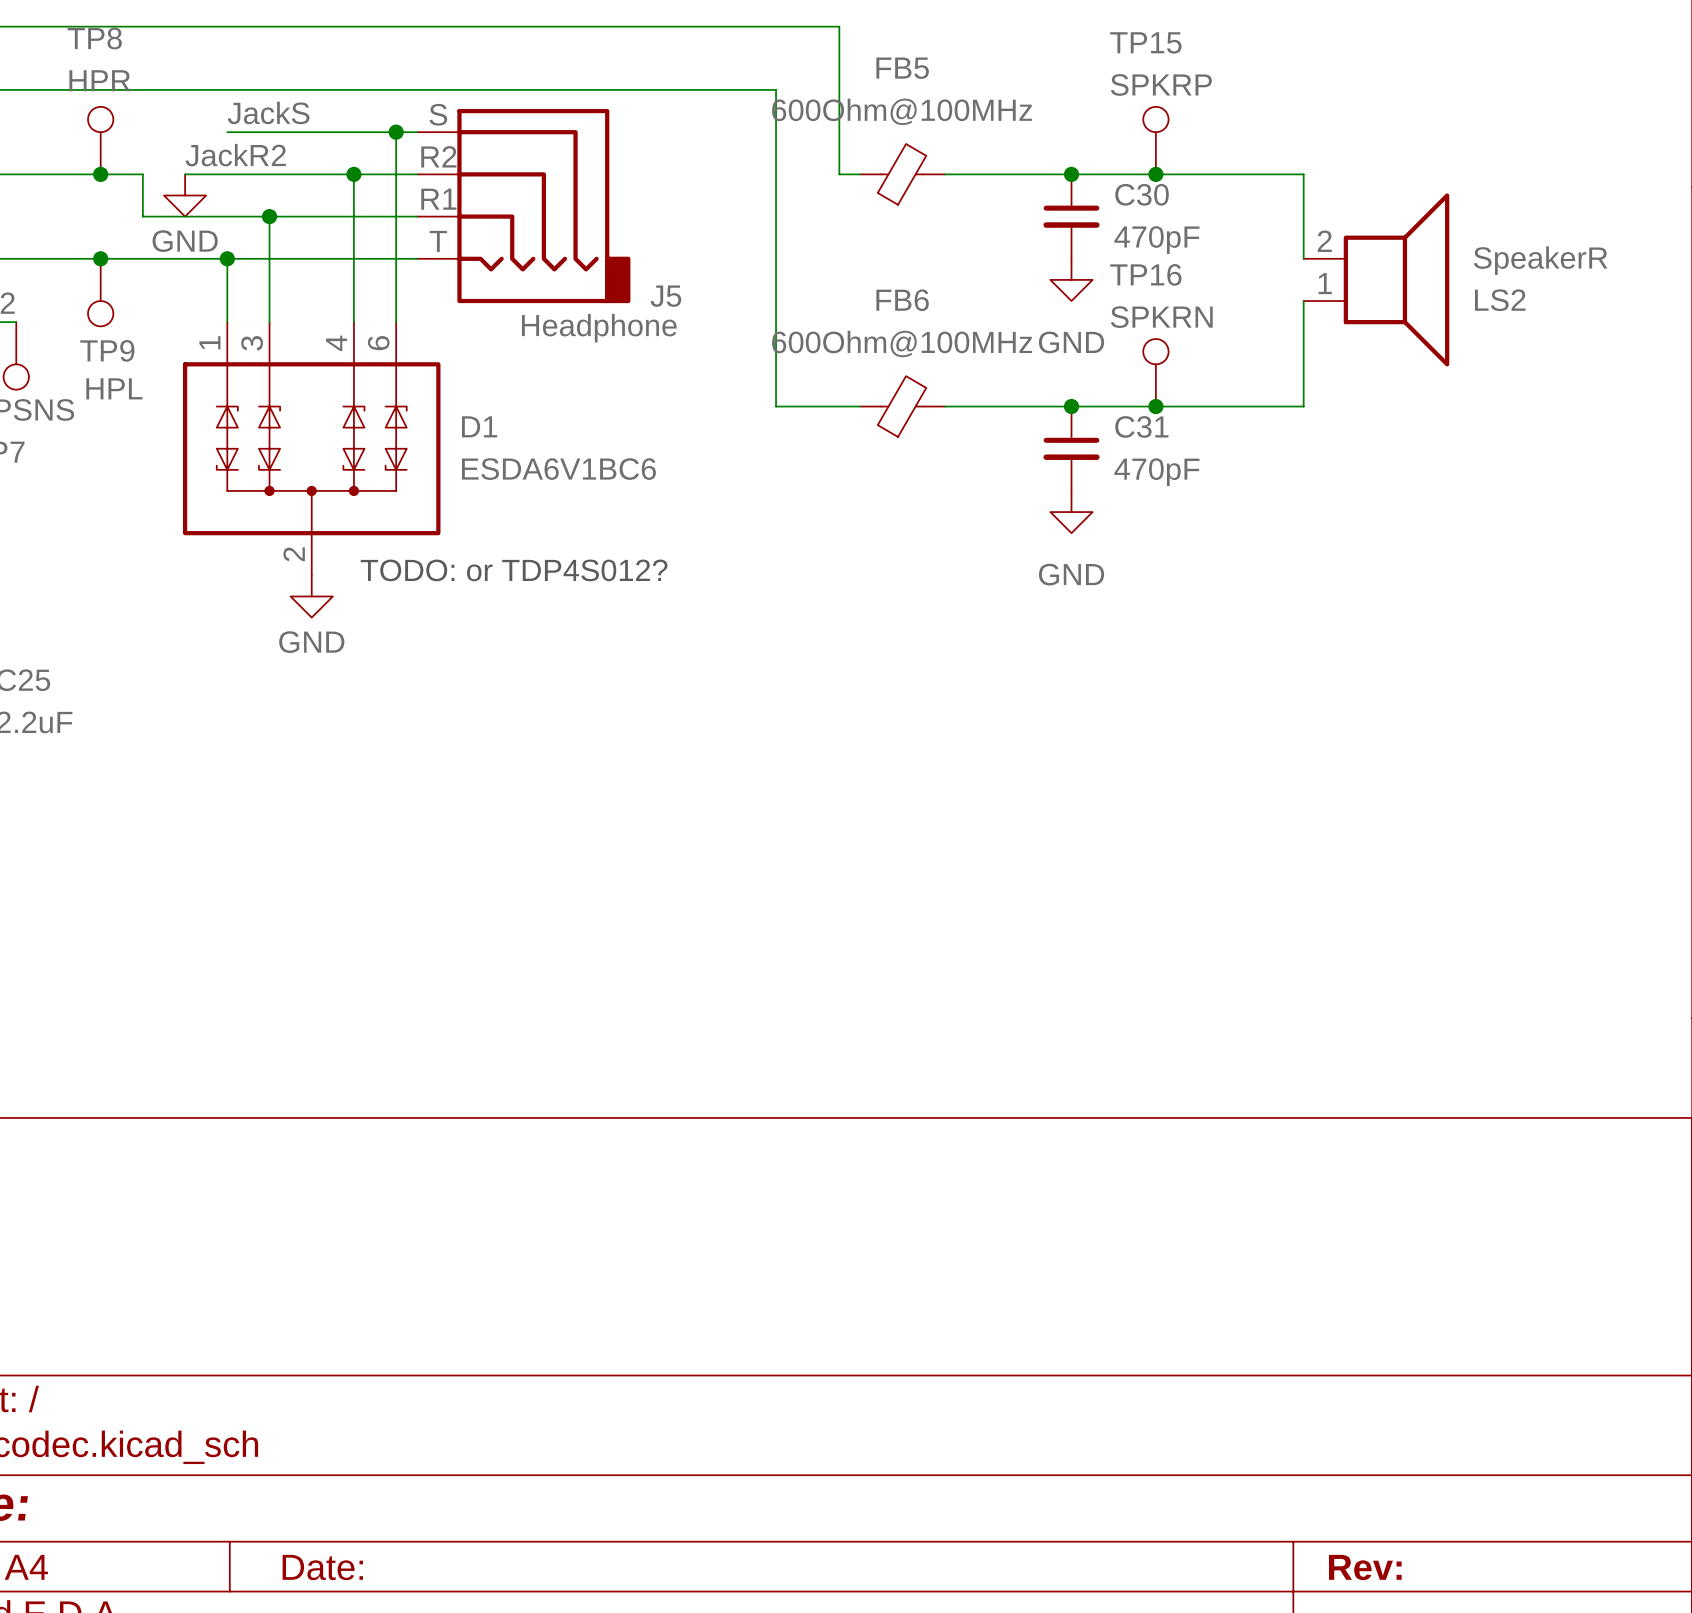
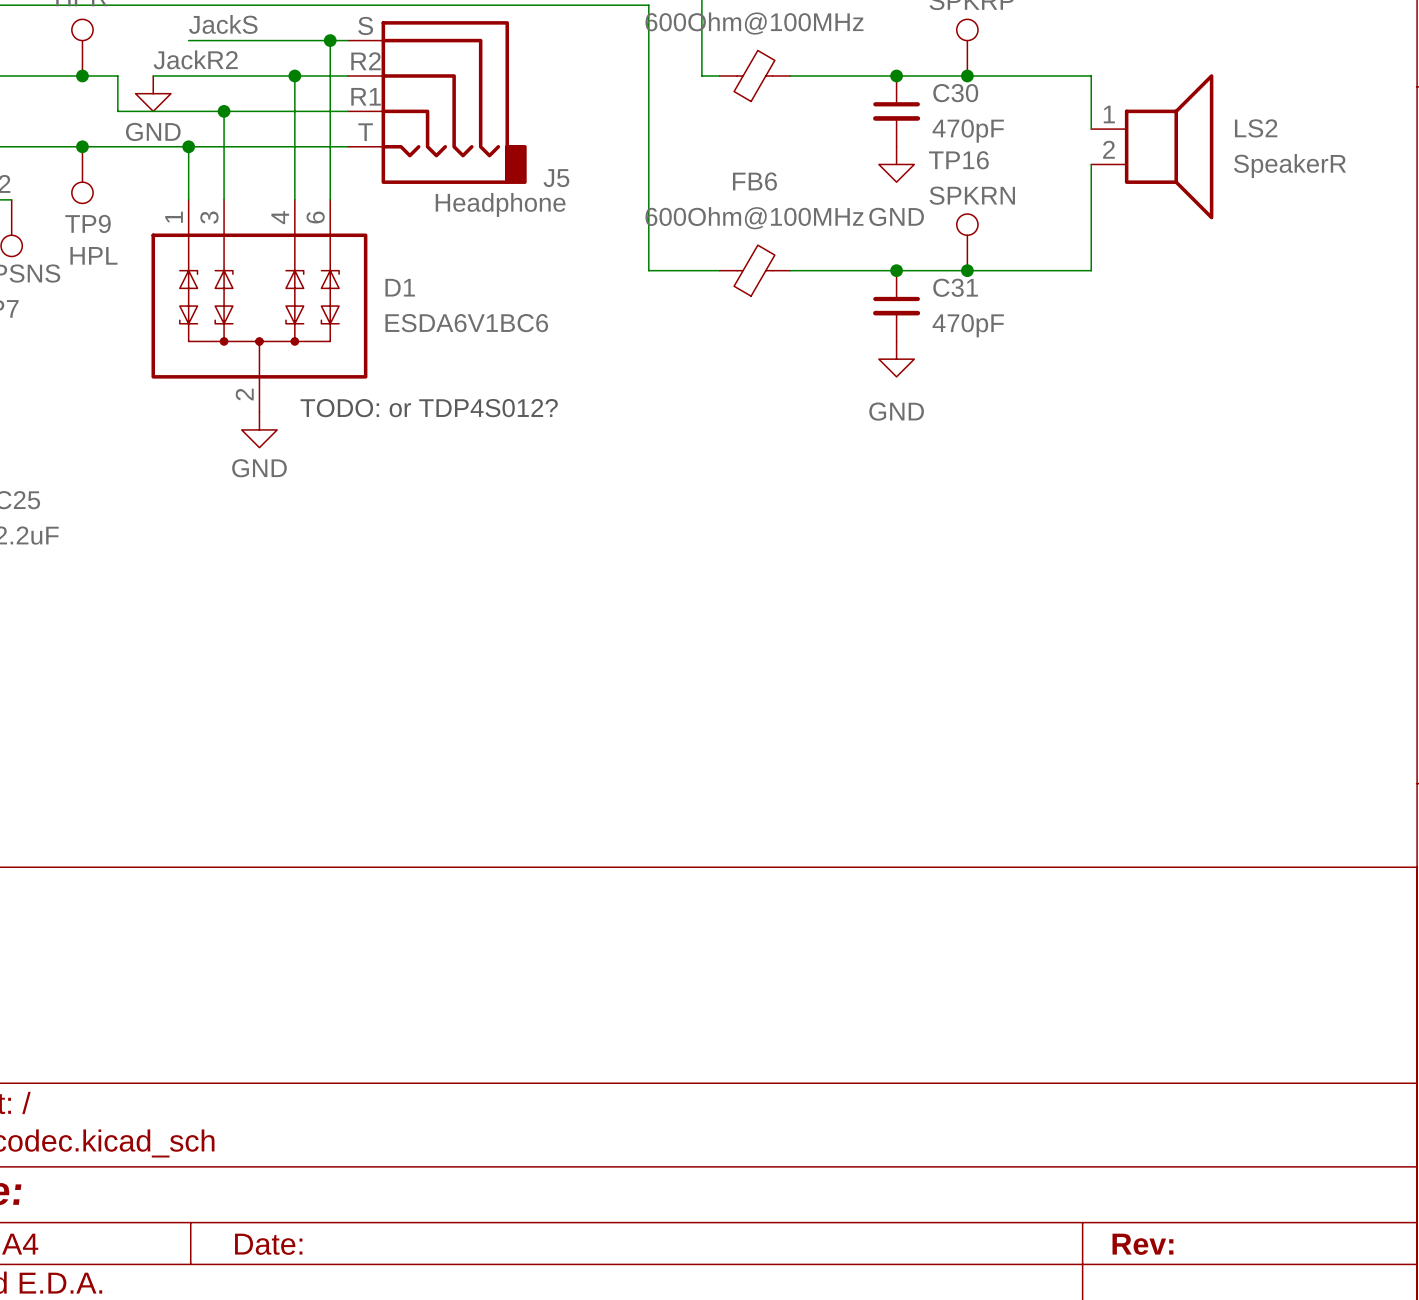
wire: (1303, 237) (1303, 258) -> (1091, 164) (1091, 182)
LS2 flip: as is (1396, 279) -> up-down (1169, 146)

